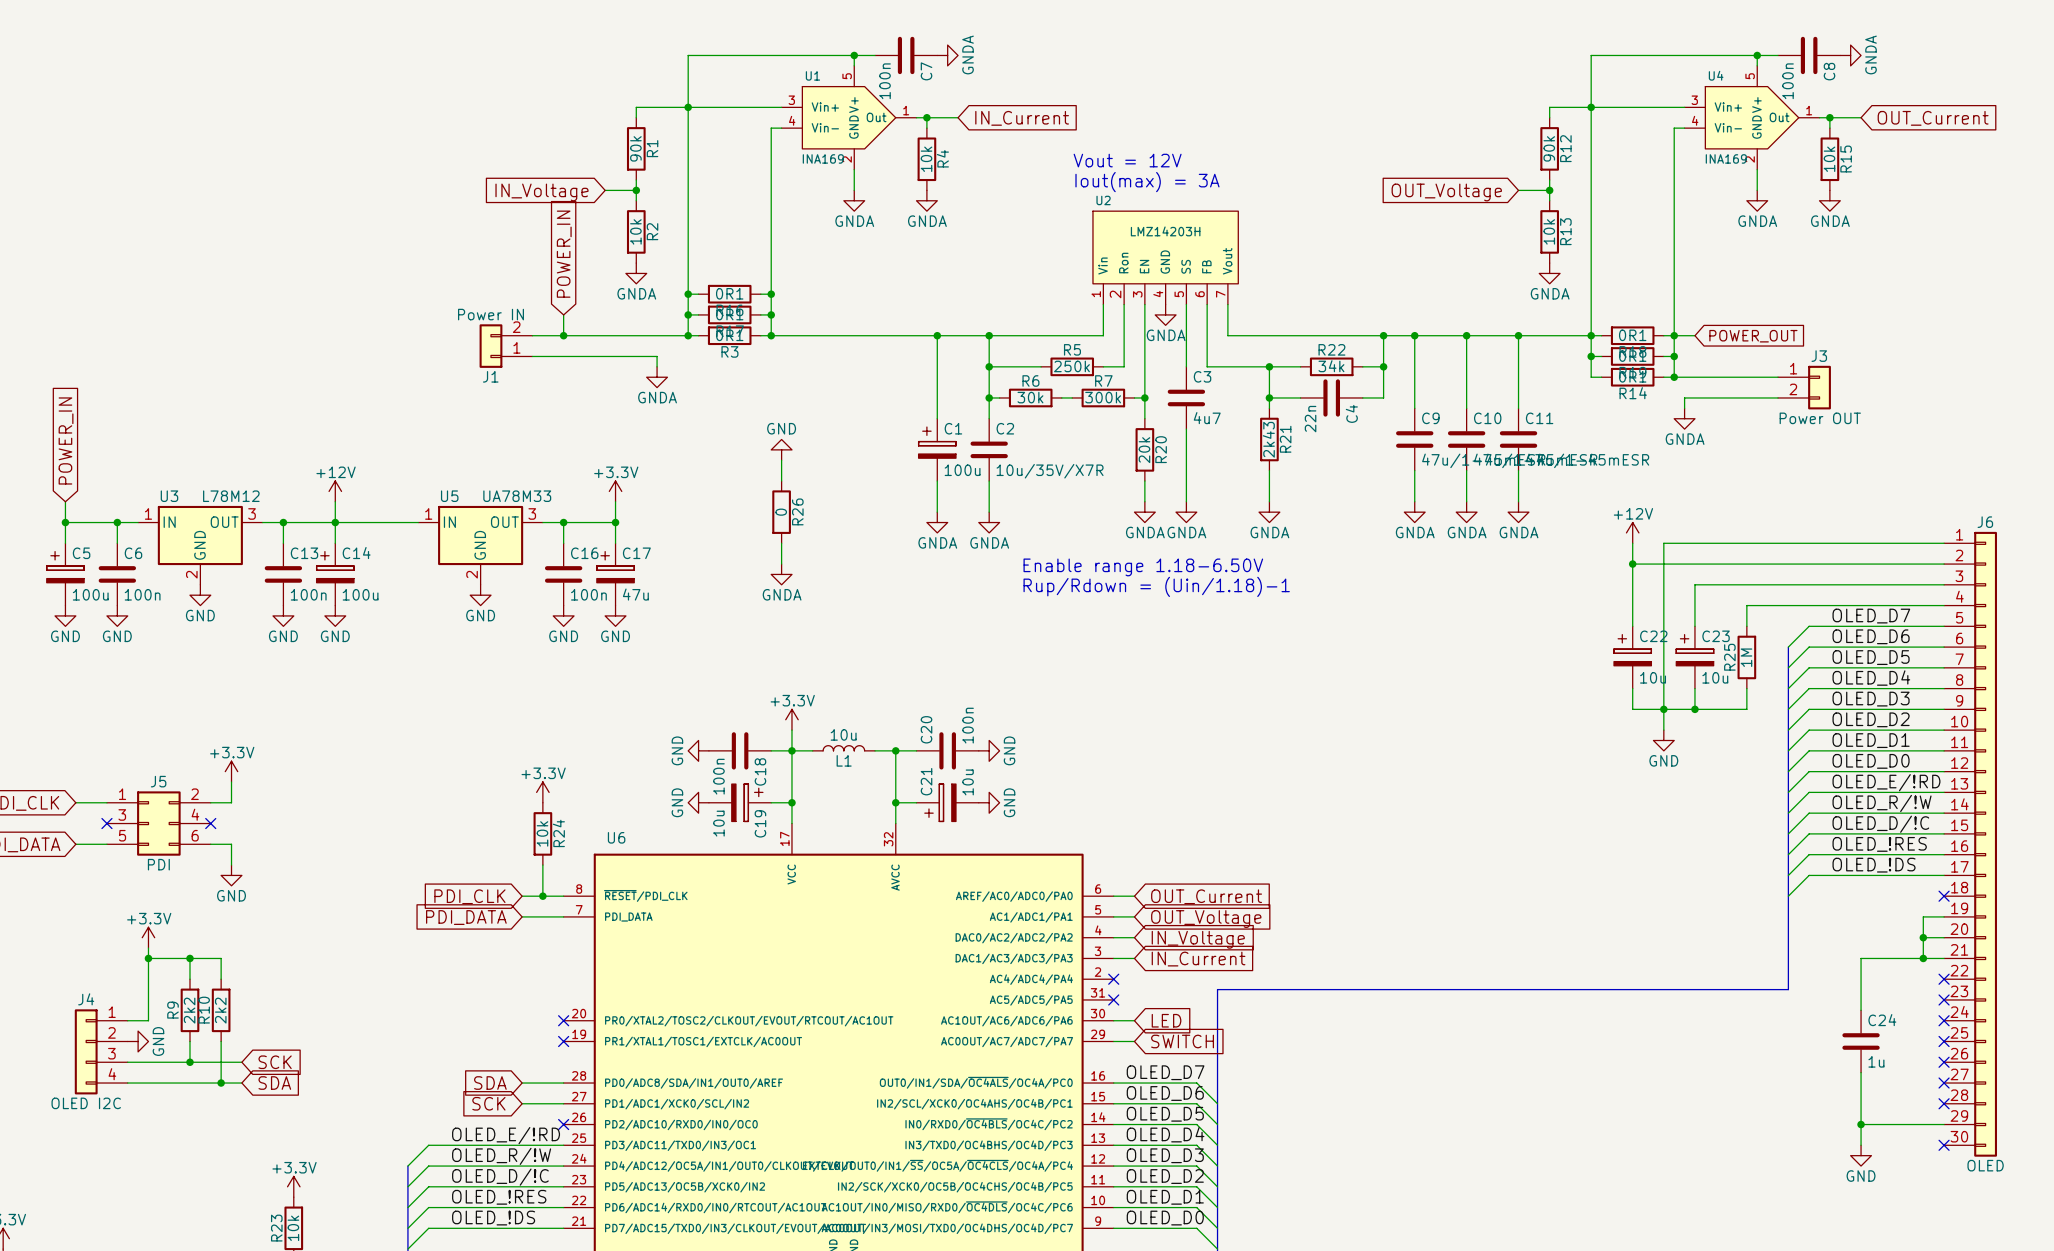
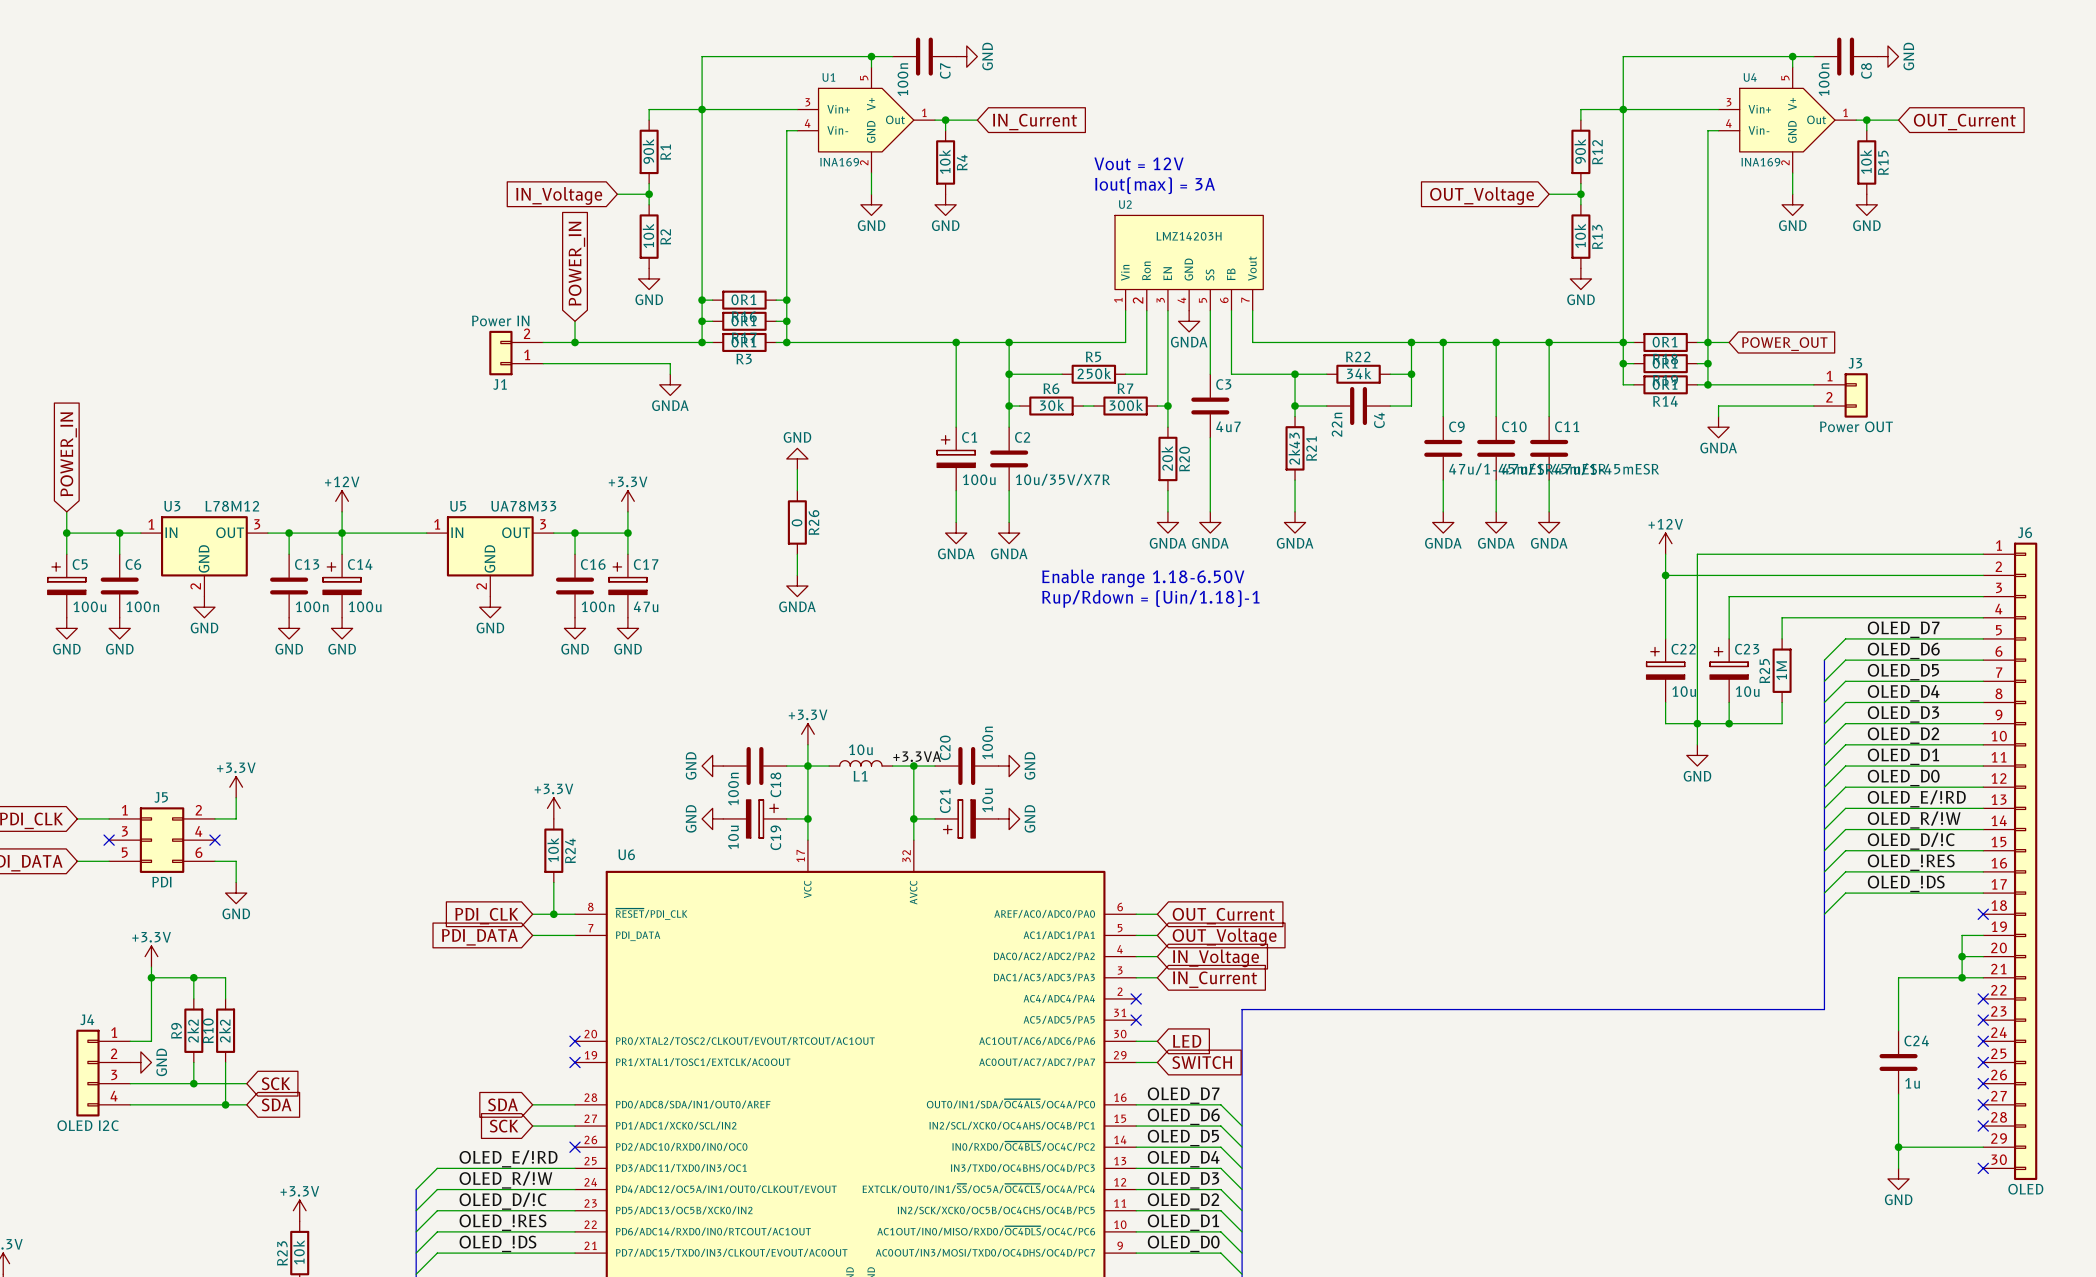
power symbol: GNDA (947, 55) -> GND (966, 56)
power symbol: GNDA (1850, 55) -> GND (1887, 56)
power symbol: GNDA (854, 200) -> GND (871, 204)
power symbol: GNDA (926, 200) -> GND (945, 204)
power symbol: GNDA (1757, 200) -> GND (1792, 204)
power symbol: GNDA (1829, 200) -> GND (1866, 204)
power symbol: GNDA (636, 273) -> GND (649, 278)
power symbol: GNDA (1549, 273) -> GND (1580, 278)
label: none -> +3.3VA (917, 756)

